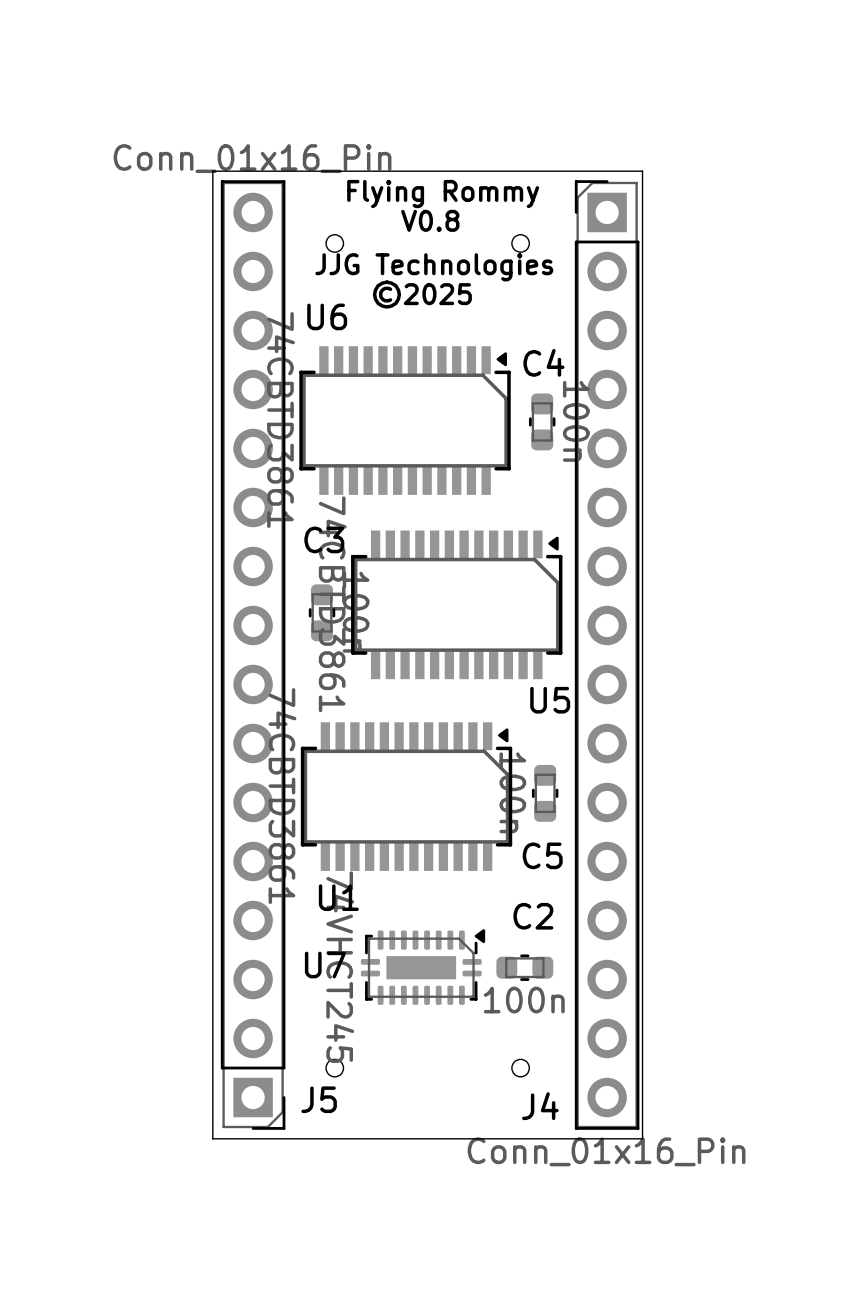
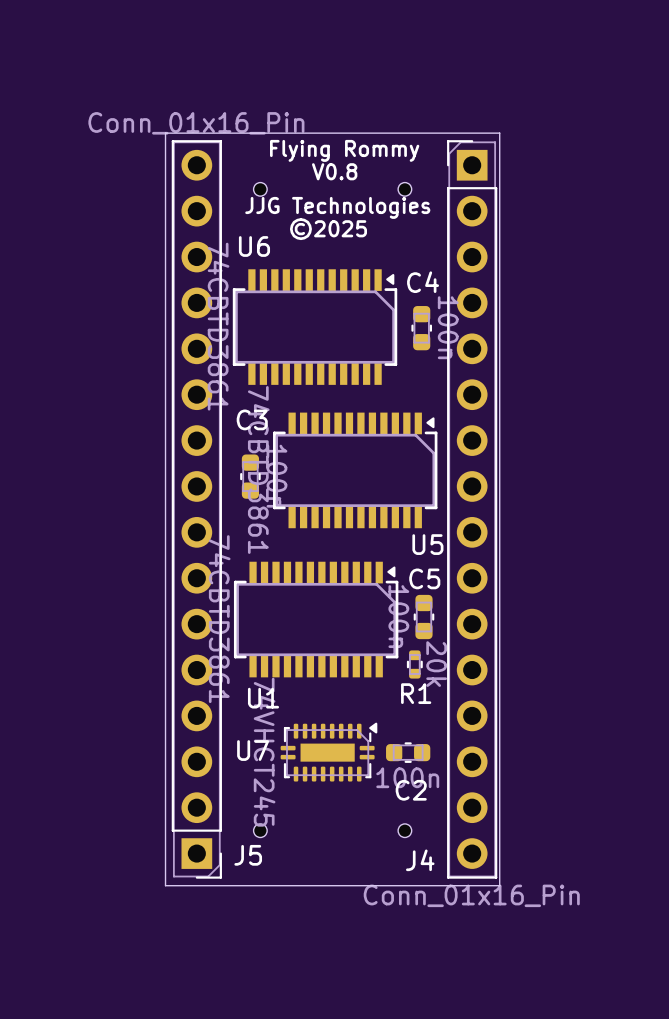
R1: none -> 20k (414, 664)
C5 name position: C5 (542, 855) -> C5 (424, 578)
C2 name position: C2 (533, 916) -> C2 (411, 790)

